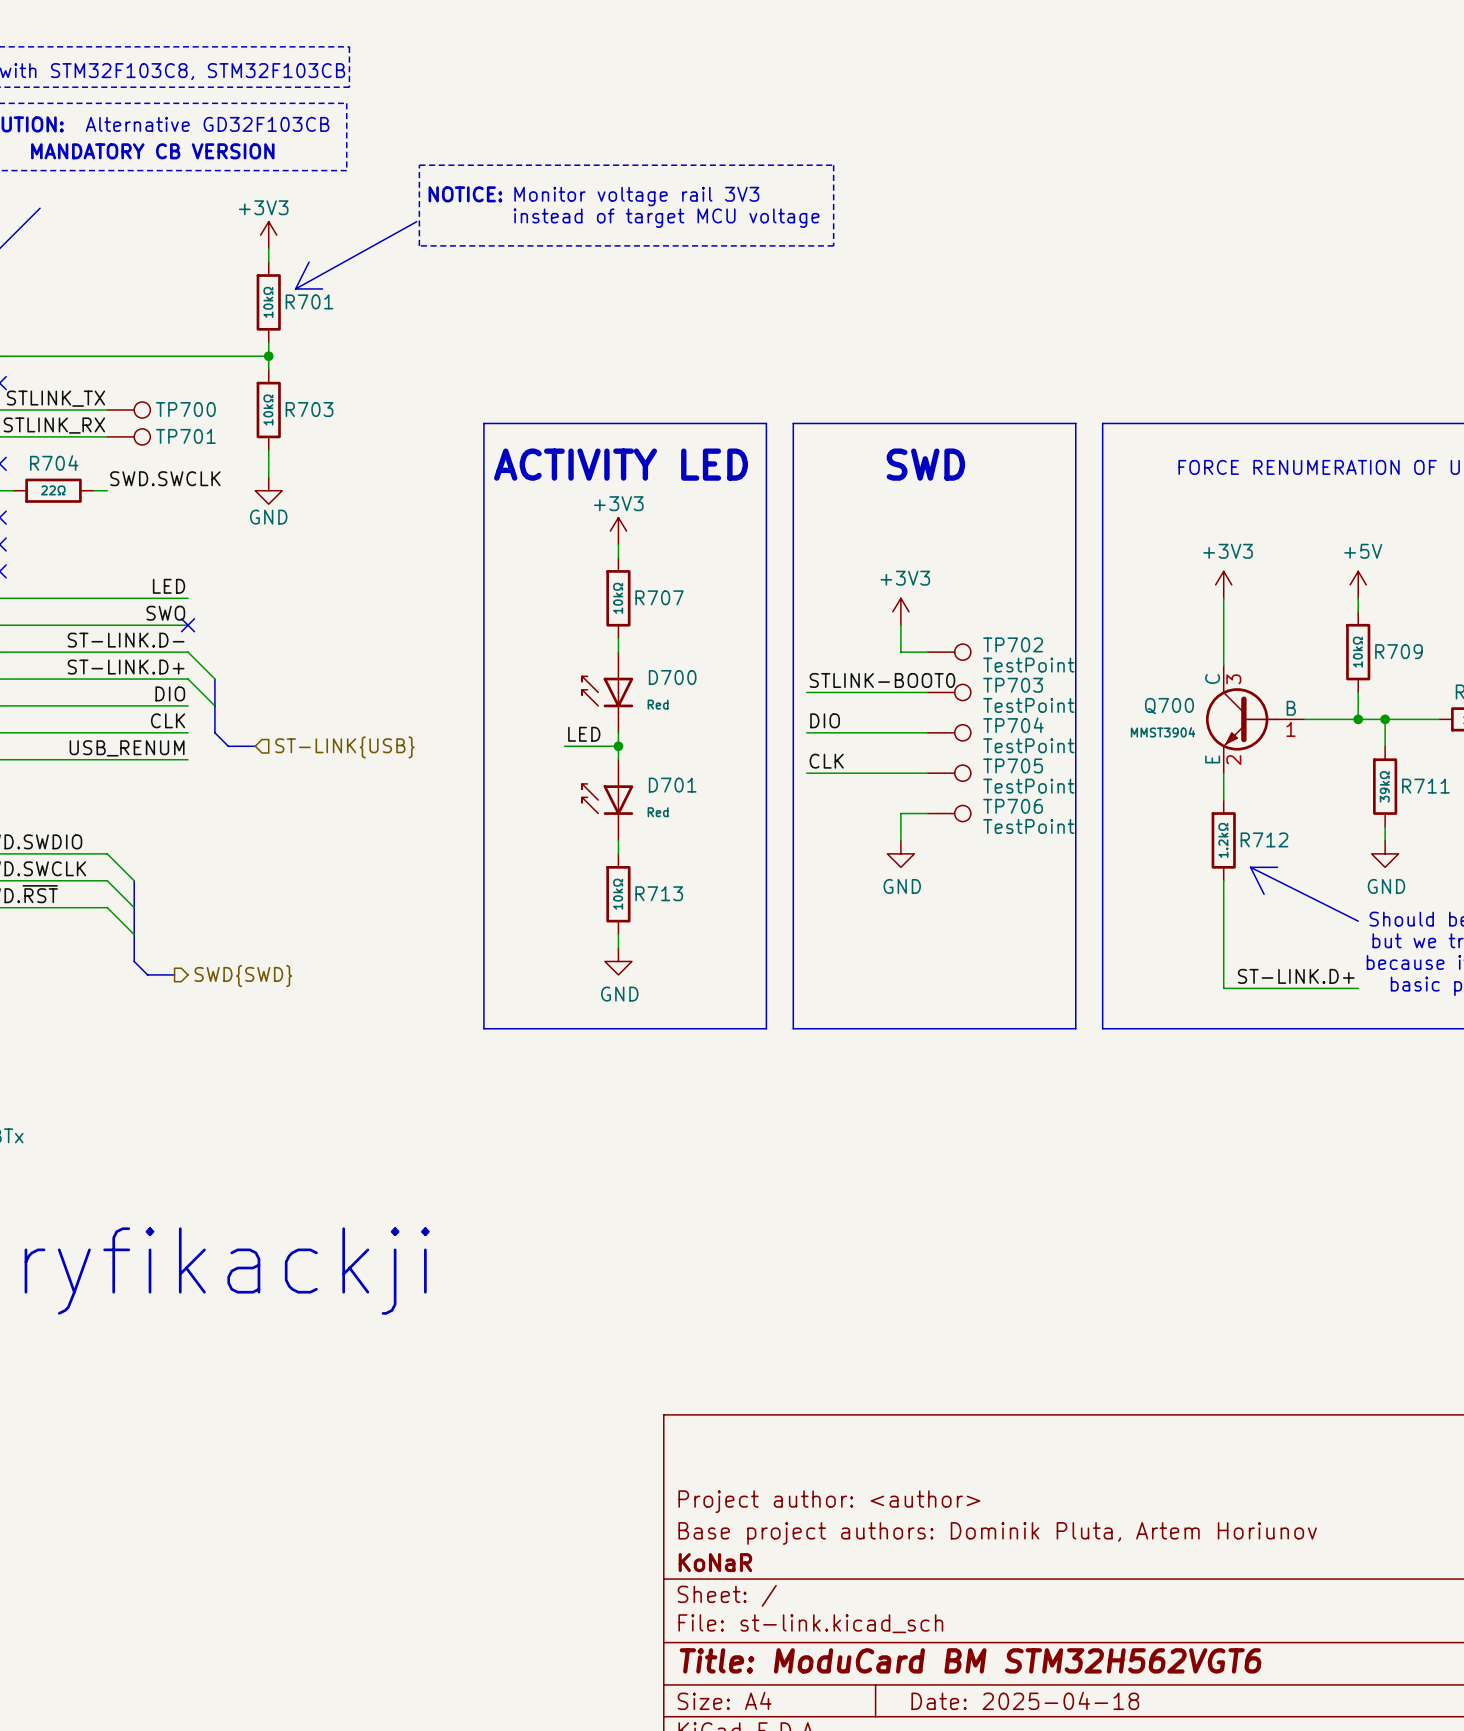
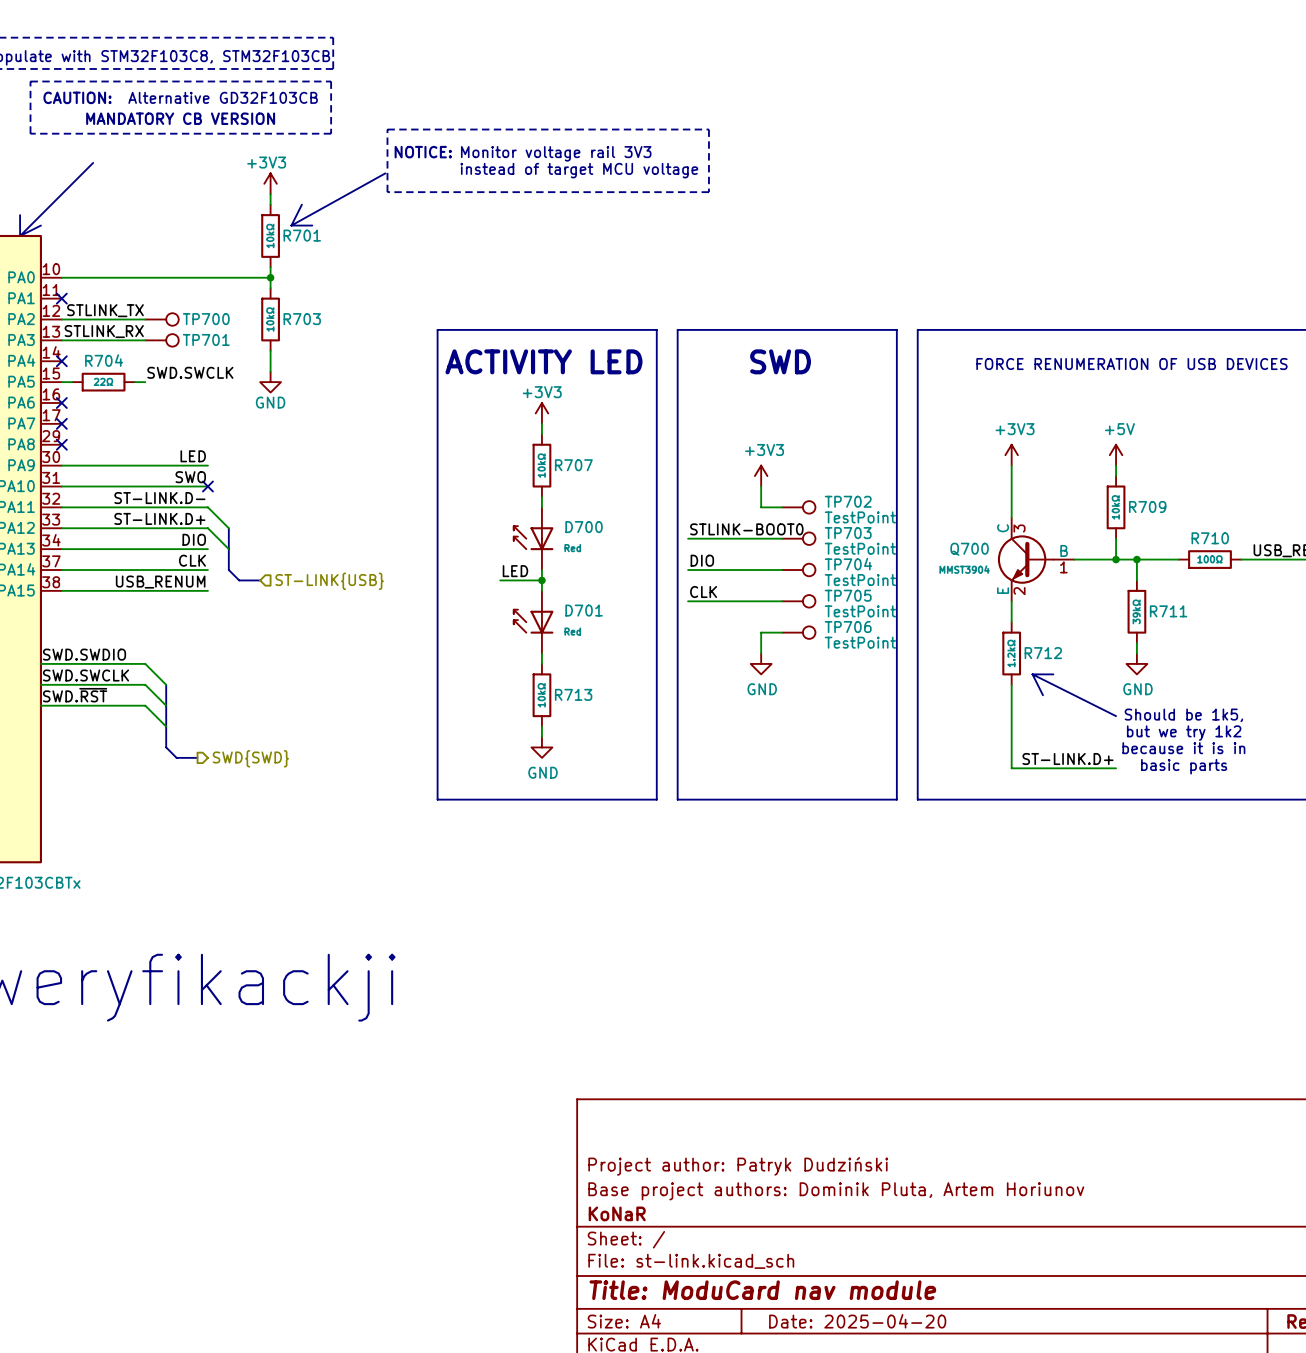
title block: Project author: <author> (829, 1501) -> Project author: Patryk Dudziński (738, 1166)
title block: Title: ModuCard BM STM32H562VGT6 (970, 1660) -> Title: ModuCard nav module (762, 1290)
title block: Date: 2025-04-18 (1025, 1700) -> Date: 2025-04-20 (857, 1321)

